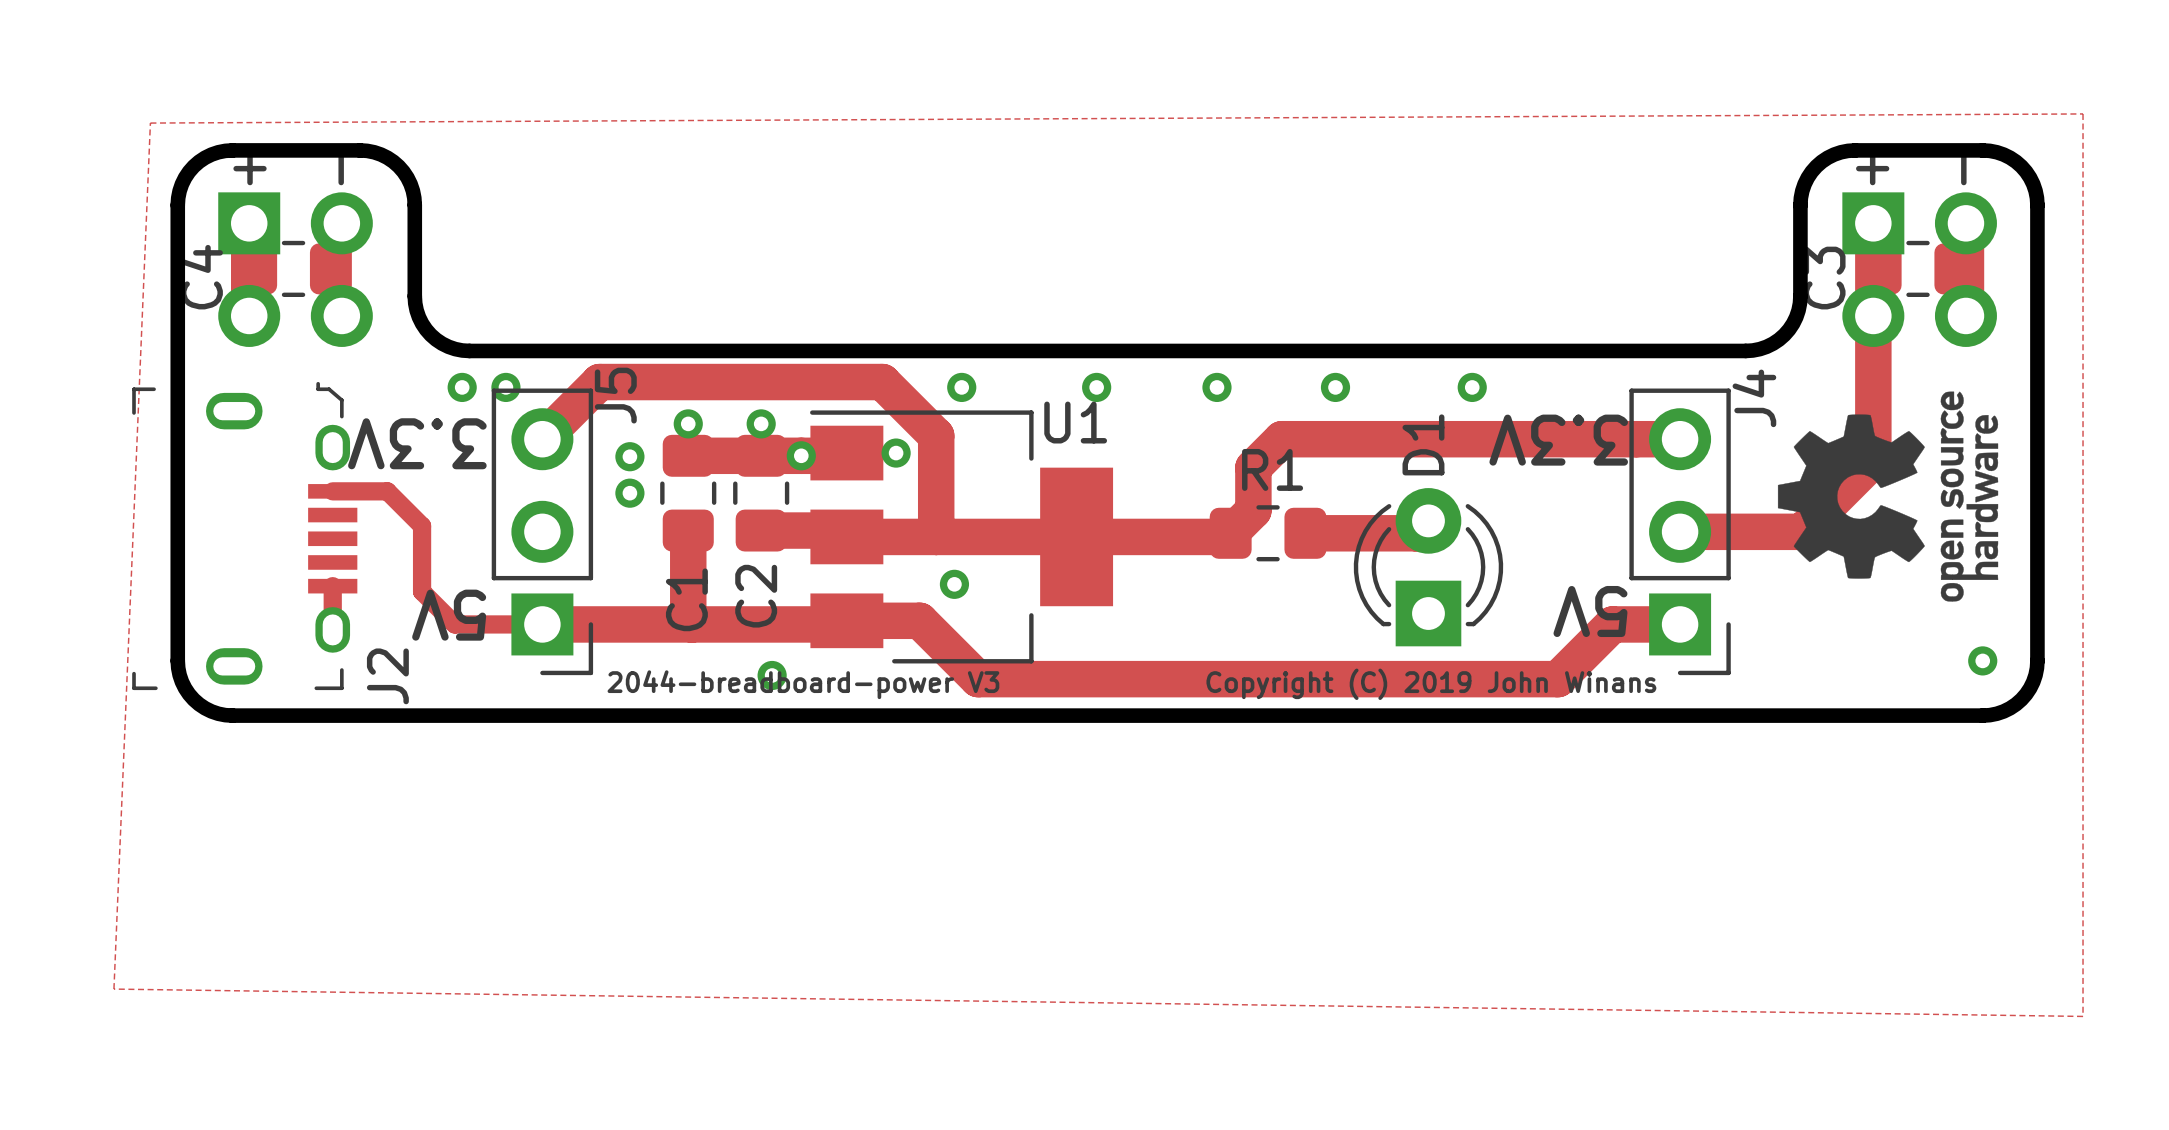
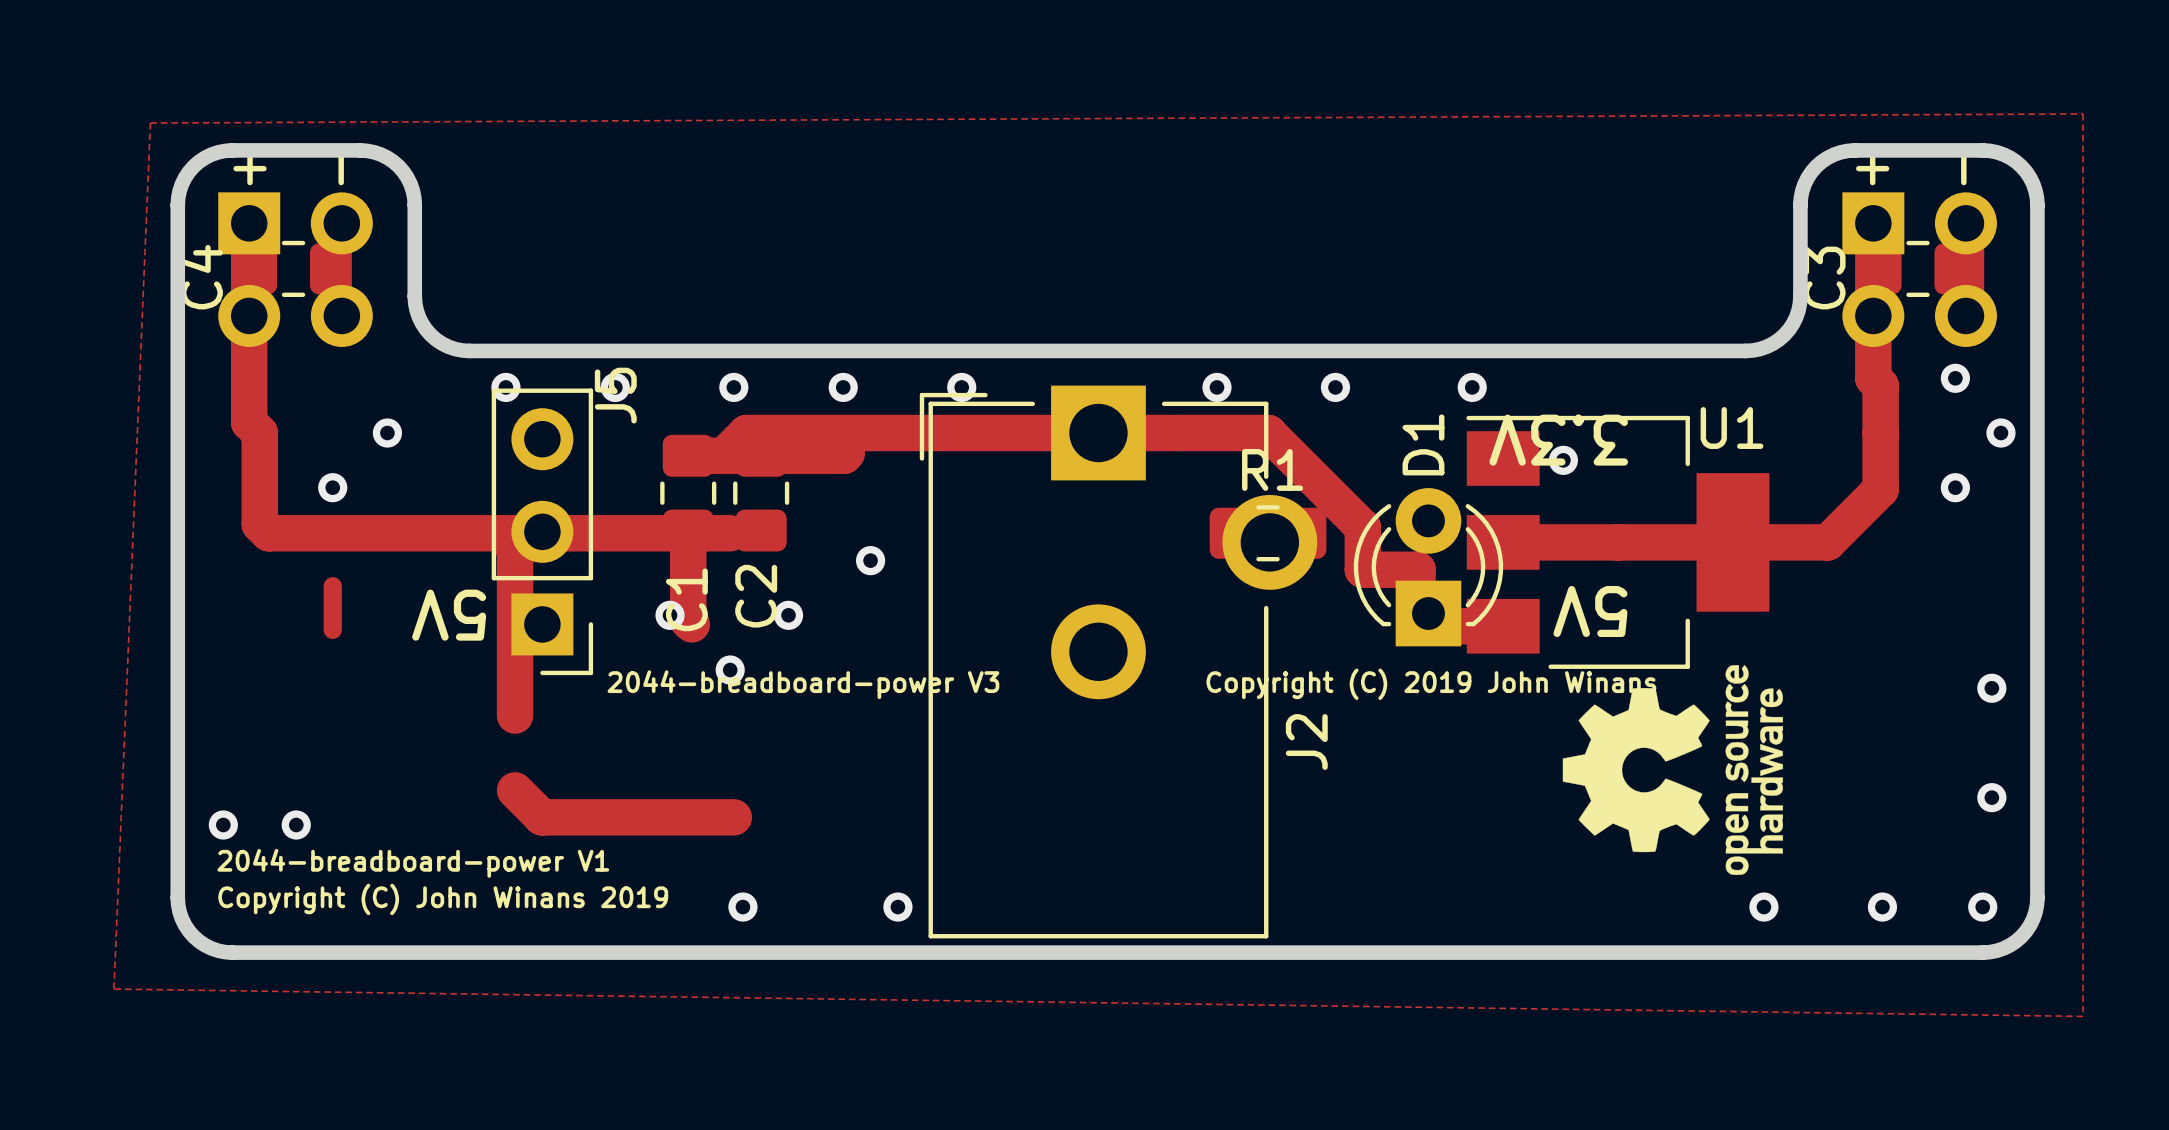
track: none -> (249, 315) (249, 422) (259, 433) (259, 524) (268, 533) (730, 533)
track: (1873, 378) (1873, 460) (1801, 531) (1680, 531) -> (1873, 378) (1880, 385) (1880, 489) (1827, 542) (1503, 542)
via: none -> (1955, 378)
J2 footprint: [132, 381, 358, 691] -> [919, 385, 1318, 939]
via: (462, 387) -> none
via: none -> (615, 387)
via: none -> (733, 387)
via: none -> (843, 387)
via: (1096, 387) -> none
via: (688, 423) -> none
via: (761, 423) -> none
via: none -> (387, 433)
via: none -> (2000, 433)
track: (542, 439) (599, 382) (882, 382) (936, 435) (936, 536) -> none
track: (1680, 439) (1281, 439) (1253, 467) (1253, 510) (1227, 536) (846, 536) (840, 530) (761, 530) -> none
text: 3.3V (417, 443) -> none
track: none -> (730, 449) (746, 433) (1268, 433) (1362, 527) (1362, 569) (1417, 569) (1417, 624) (1419, 626) (1503, 626)
via: (896, 453) -> none
via: (801, 455) -> none
via: (629, 456) -> none
via: none -> (1563, 460)
via: none -> (332, 487)
via: none -> (1955, 487)
track: (332, 491) (387, 491) (422, 525) (422, 591) (454, 624) (843, 624) (846, 620) (919, 620) (978, 679) (1557, 679) (1612, 624) (1680, 624) -> none
via: (629, 493) -> none
drawing position: (1888, 496) -> (1672, 770)
track: (1428, 520) (1416, 533) (1305, 533) -> none
J4: (1680, 531) -> none
track: none -> (500, 533) (515, 547) (515, 715)
U1 position: (961, 536) -> (1617, 542)
via: none -> (870, 560)
via: (954, 584) -> none
via: none -> (670, 615)
via: none -> (788, 615)
board edge: (177, 660) (181, 681) (193, 699) (211, 711) (232, 715) (1982, 715) (2003, 711) (2021, 699) (2033, 681) (2037, 660) -> (177, 660) (178, 905) (185, 925) (199, 941) (211, 948) (232, 952) (1989, 952) (2003, 948) (2021, 936) (2033, 918) (2036, 905) (2037, 660)
via position: (1982, 660) -> (1991, 688)
via: none -> (730, 670)
via: (772, 675) -> none
J2 name position: J2 (387, 676) -> J2 (1306, 742)
track: none -> (515, 790) (542, 817) (733, 817)
via: none -> (1991, 797)
via: none -> (223, 825)
via: none -> (296, 825)
text: none -> 2044-breadboard-power V1 (413, 863)
text: none -> Copyright (C) John Winans 2019 (443, 899)
via: none -> (742, 907)
via: none -> (897, 907)
via: none -> (1763, 907)
via: none -> (1882, 907)
via: none -> (1982, 907)

